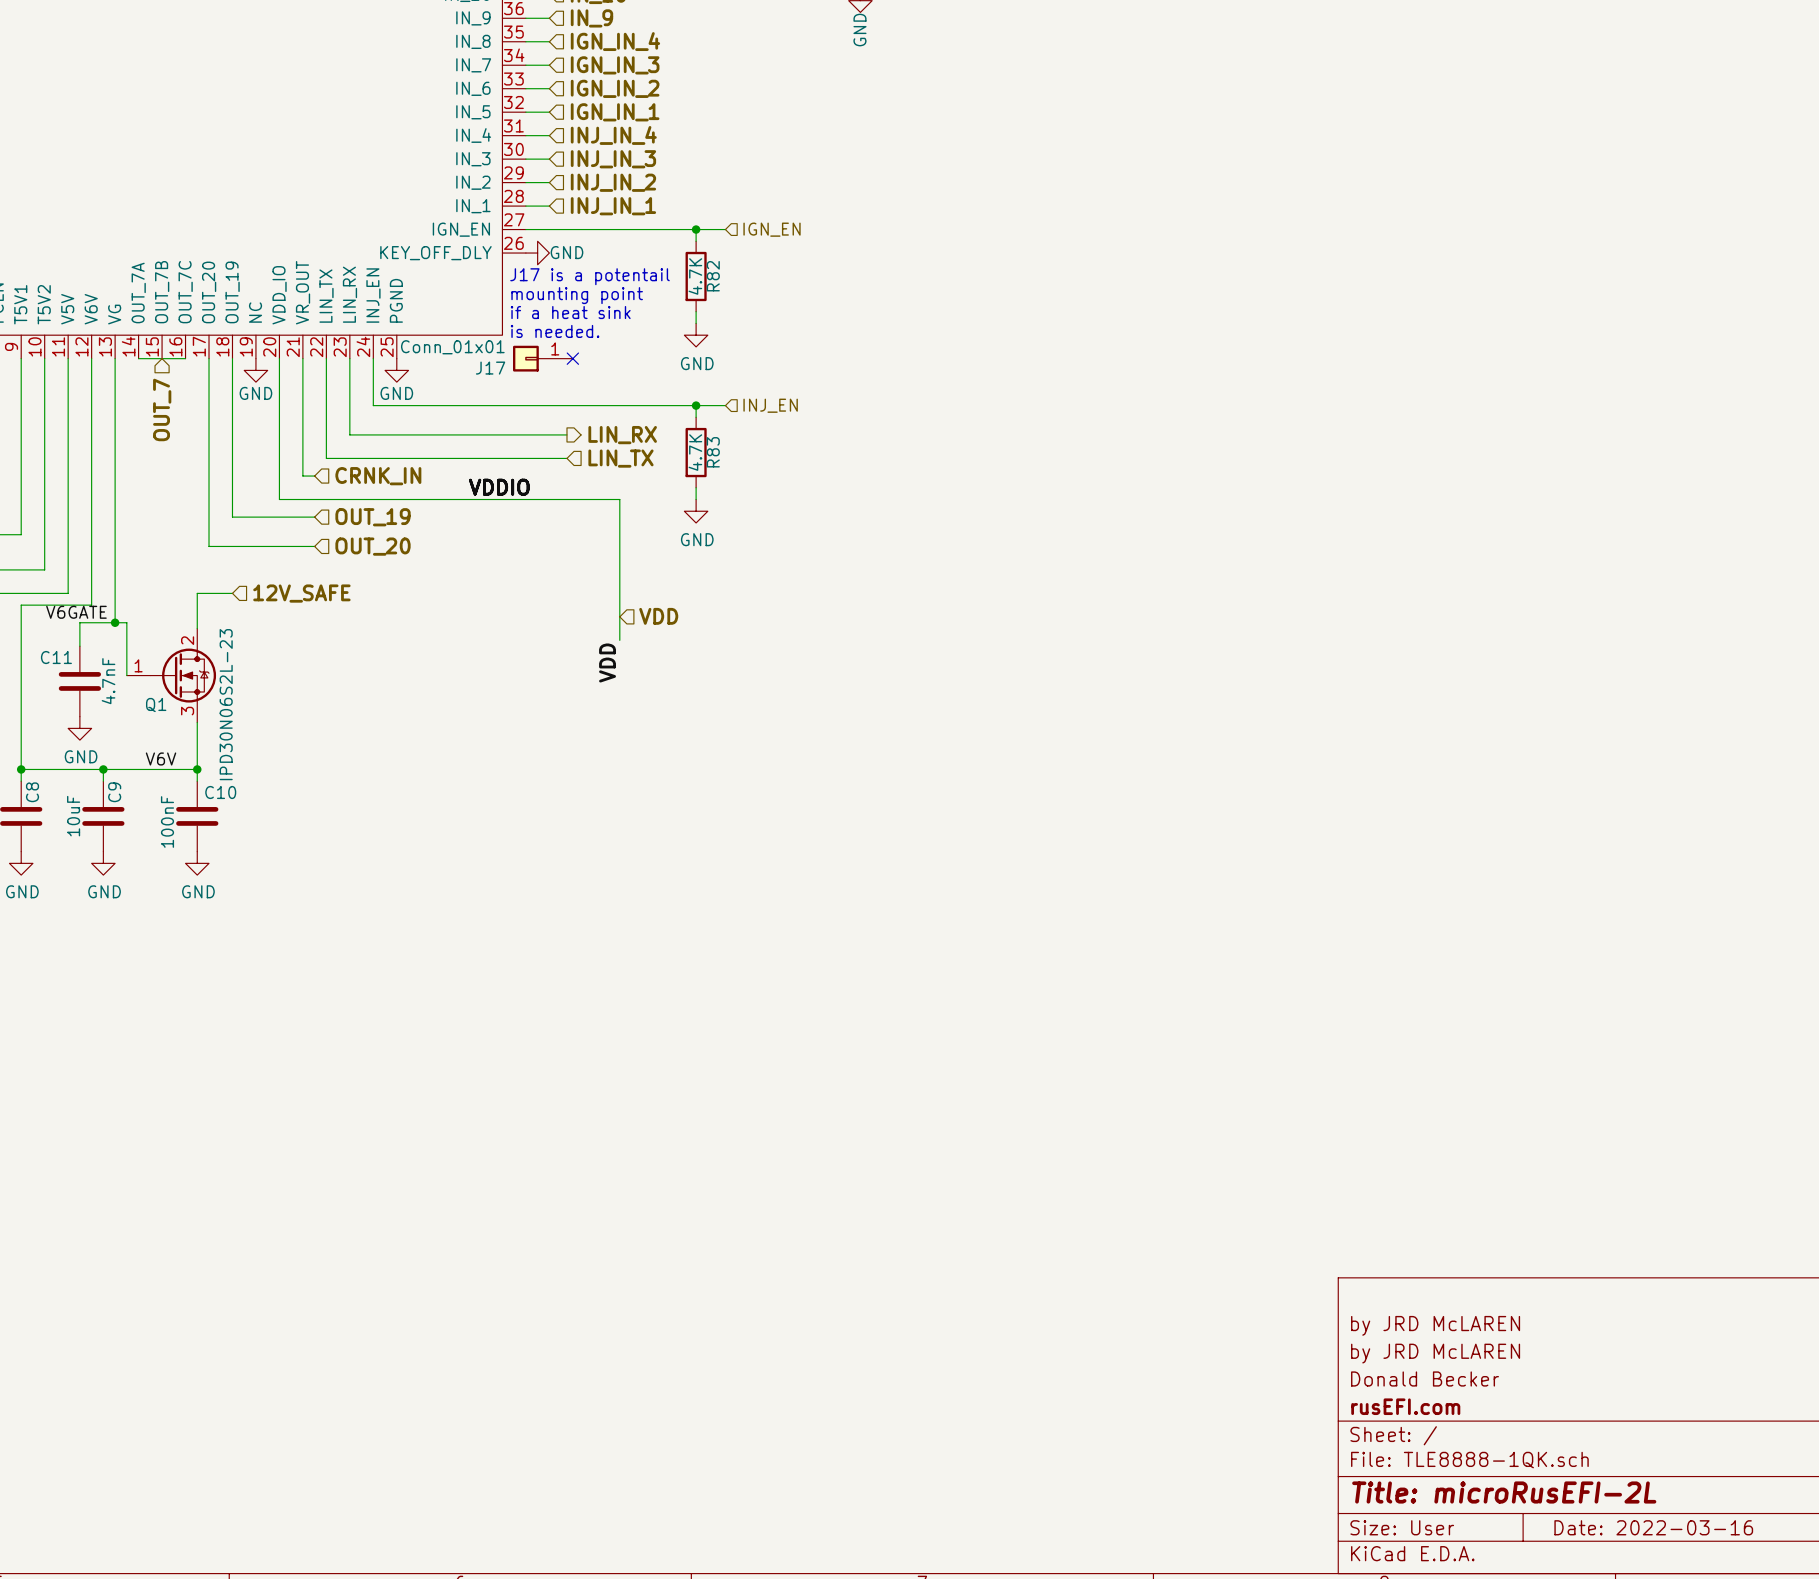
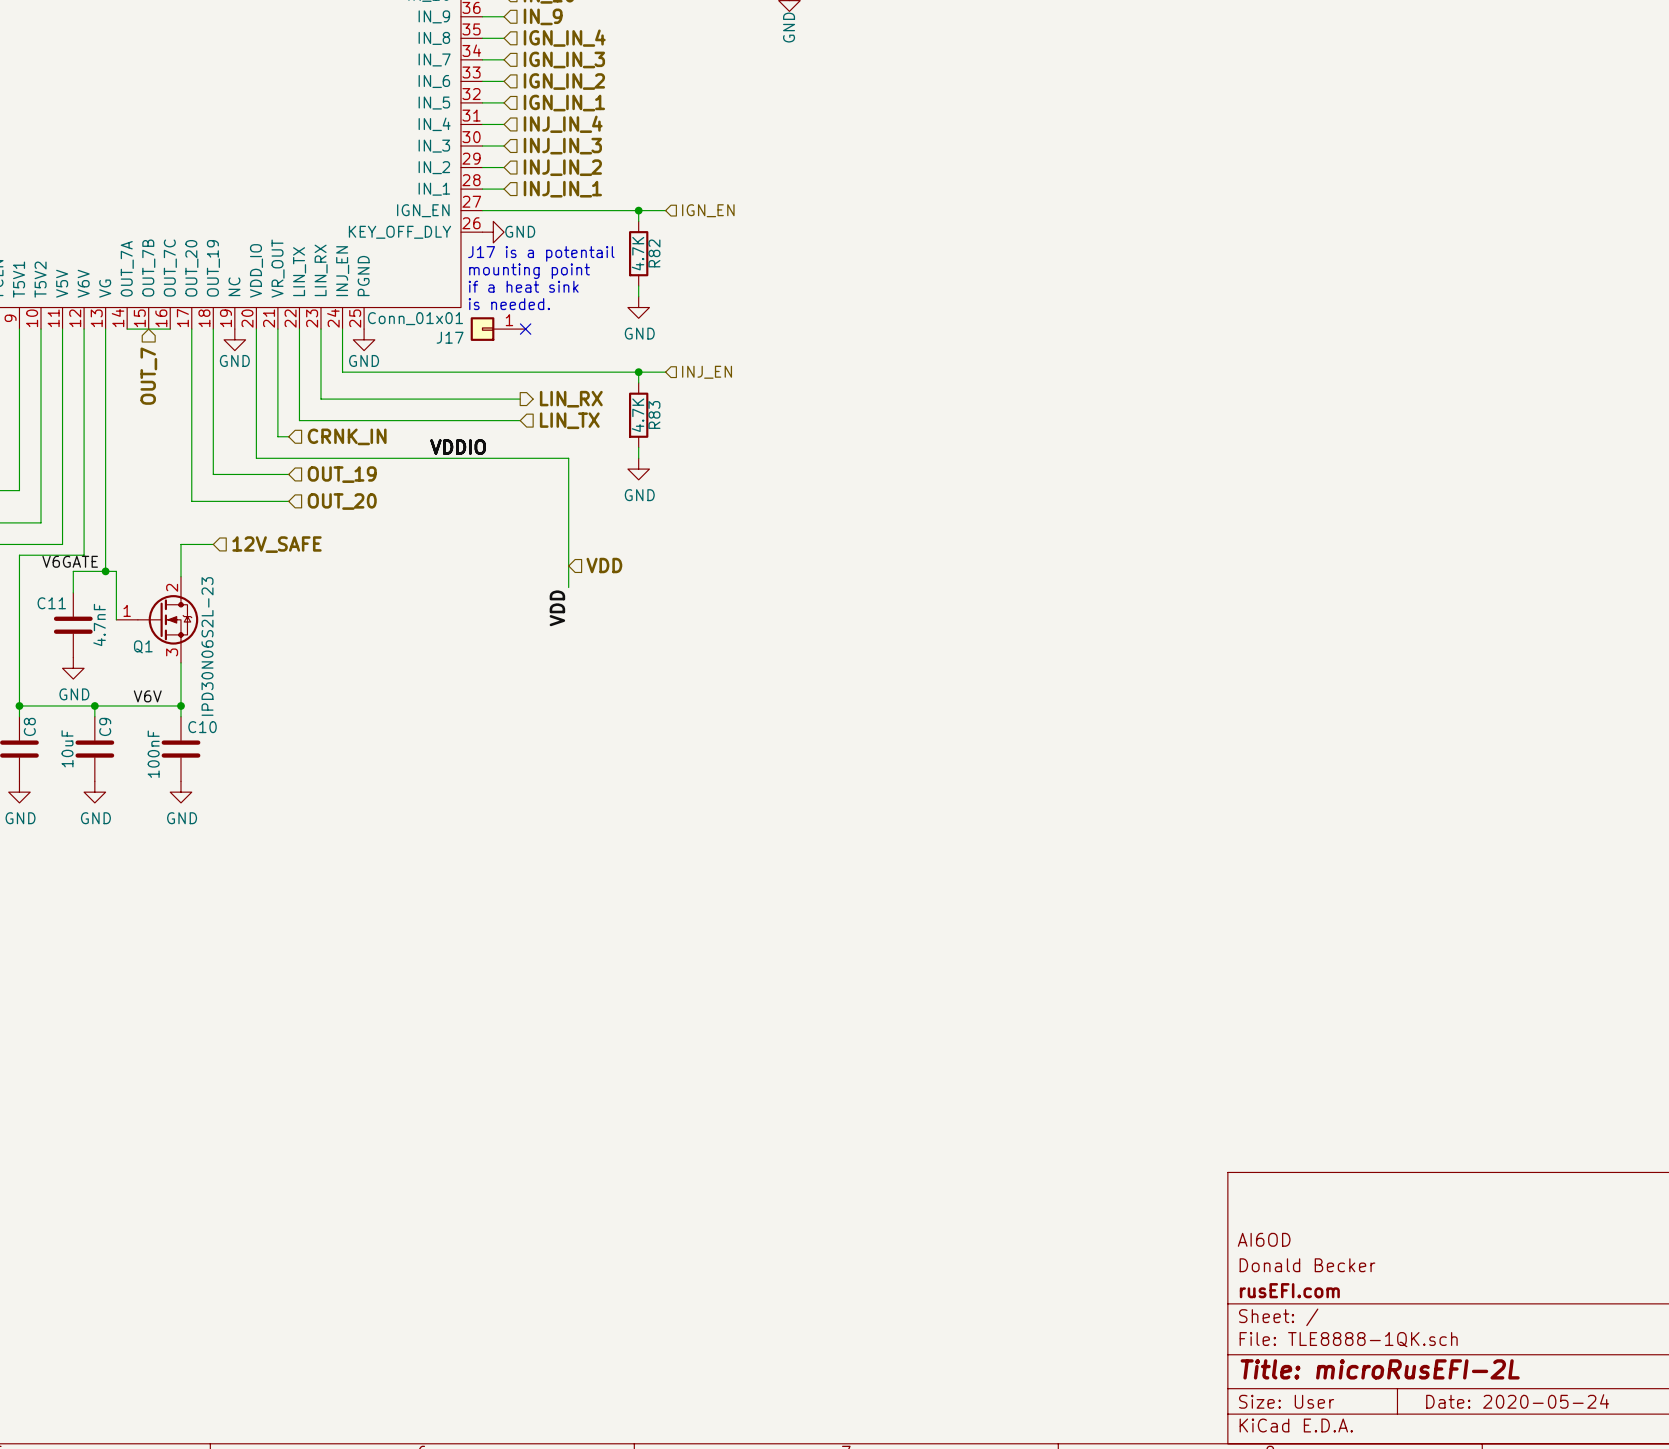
title block: by JRD McLAREN (1435, 1325) -> none
title block: by JRD McLAREN (1435, 1353) -> AI6OD (1264, 1239)
title block: Date: 2022-03-16 (1653, 1527) -> Date: 2020-05-24 (1517, 1401)

